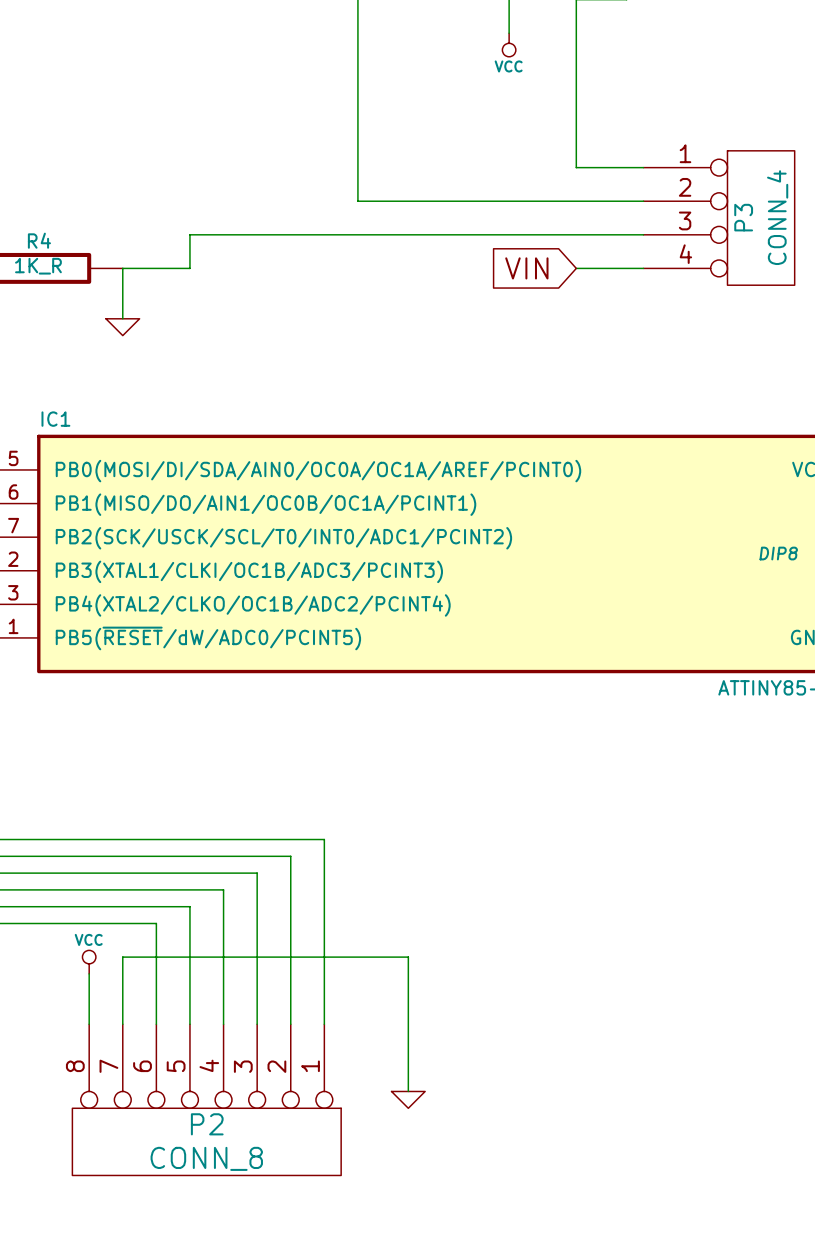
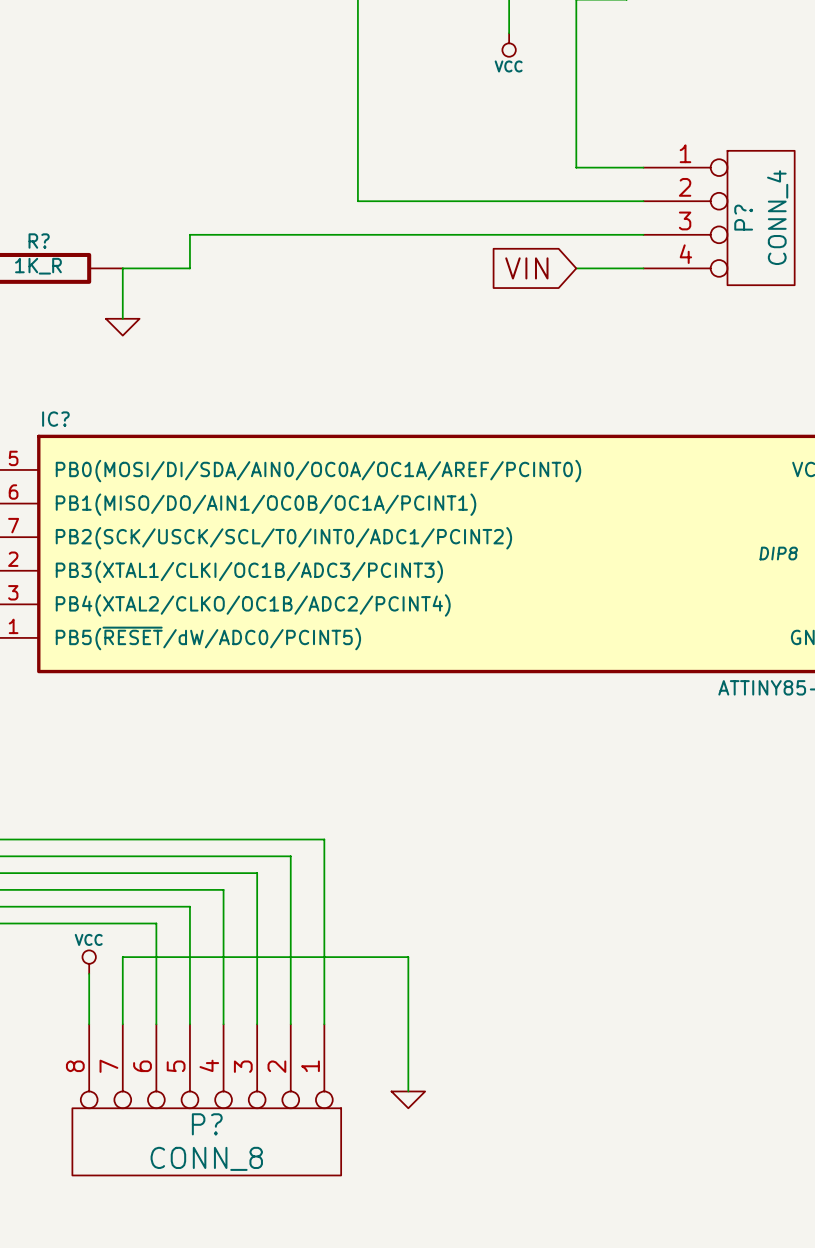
P3 name: P3 (743, 217) -> P? (743, 217)
R4 name: R4 (39, 240) -> R? (39, 241)
IC1 name: IC1 (55, 419) -> IC? (55, 419)
P2 name: P2 (207, 1124) -> P? (207, 1124)

